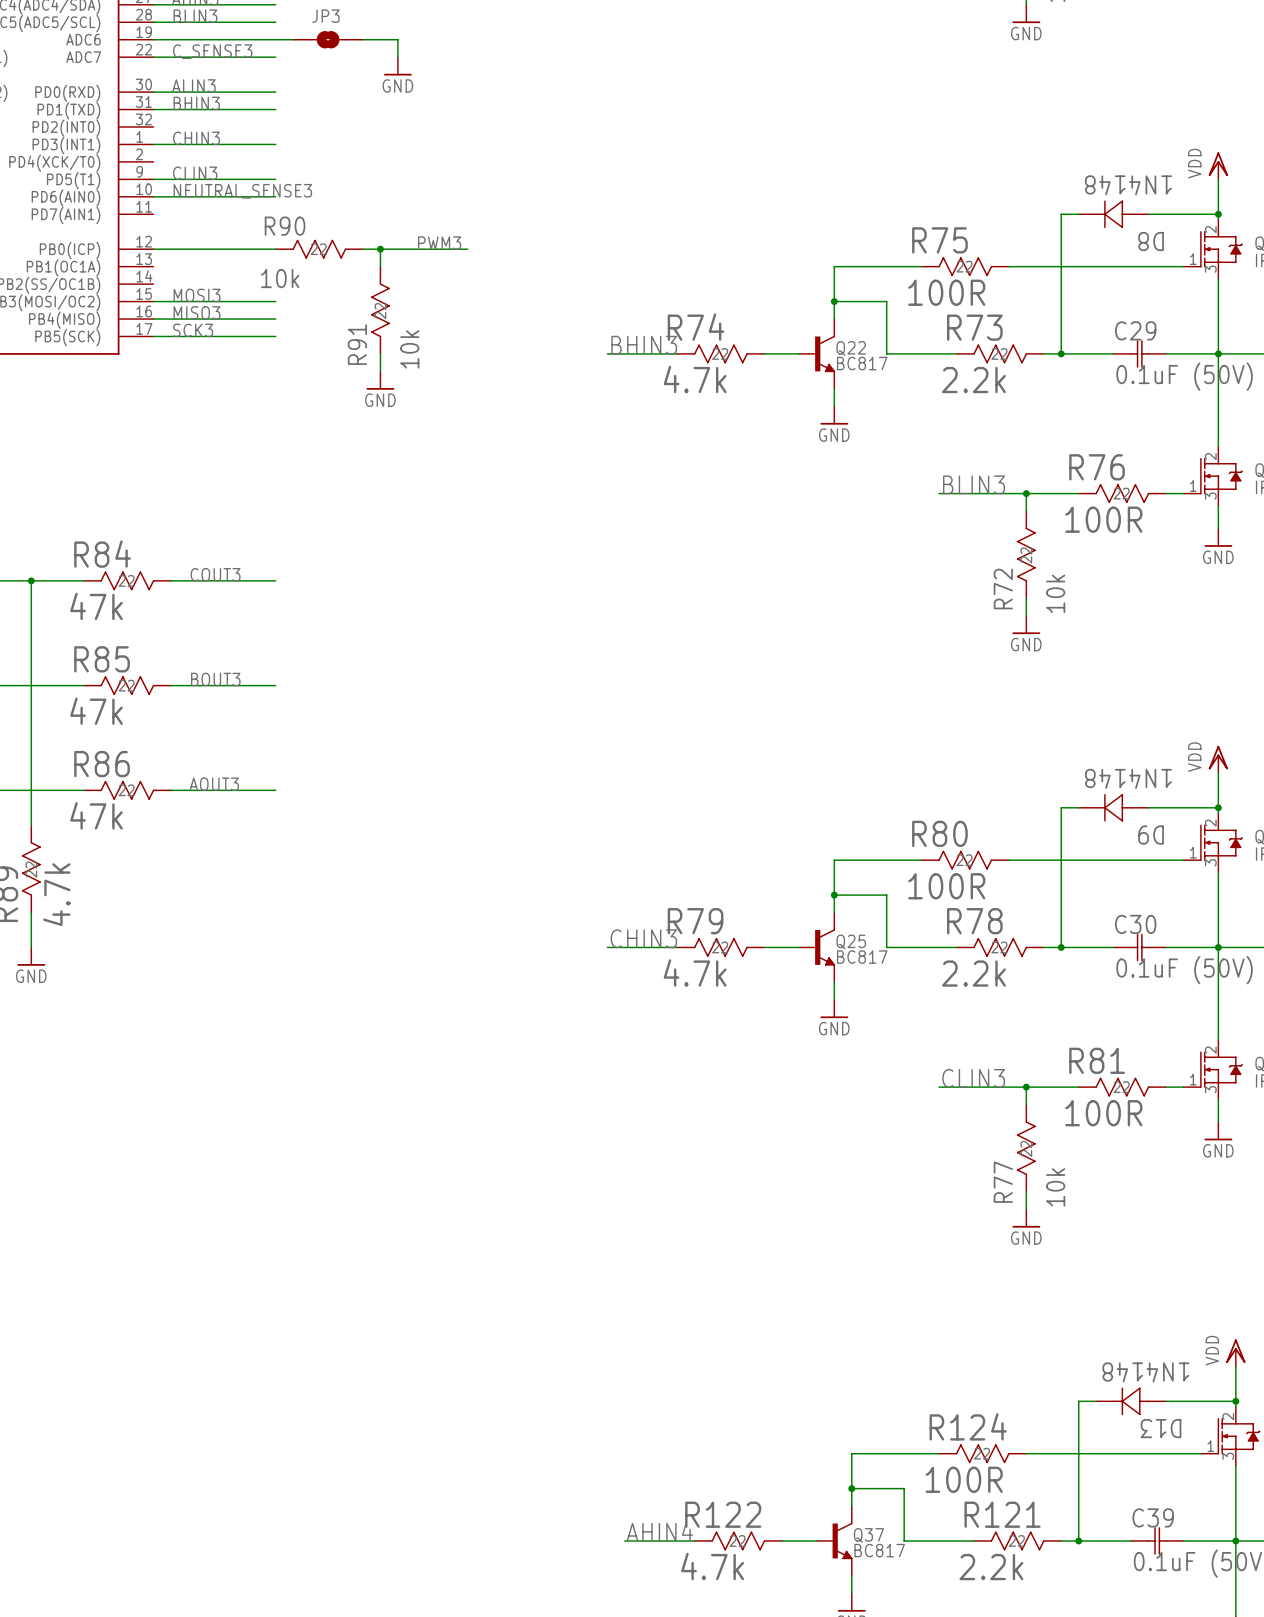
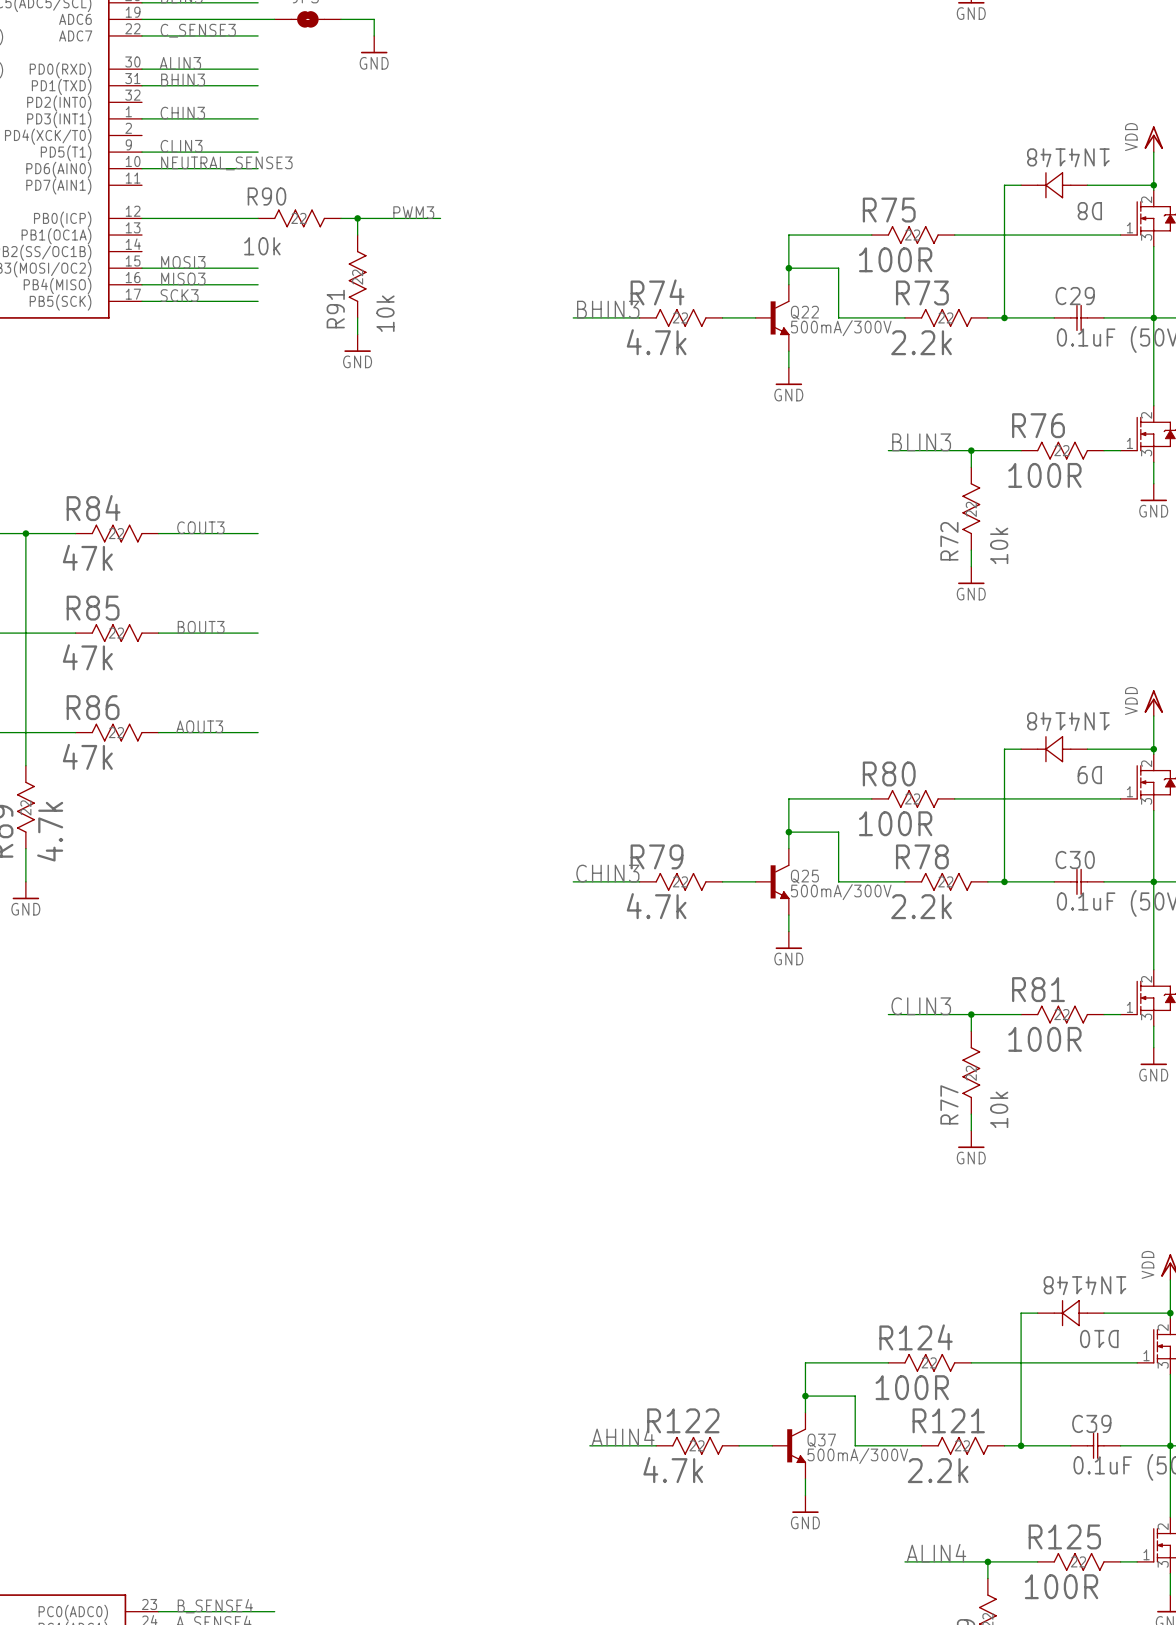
Q22 value: BC817 (862, 363) -> 500mA/300V (841, 328)
Q25 value: BC817 (862, 957) -> 500mA/300V (841, 892)
D13 name: D13 (1161, 1428) -> D10 (1099, 1339)
Q37 value: BC817 (879, 1550) -> 500mA/300V (857, 1456)

